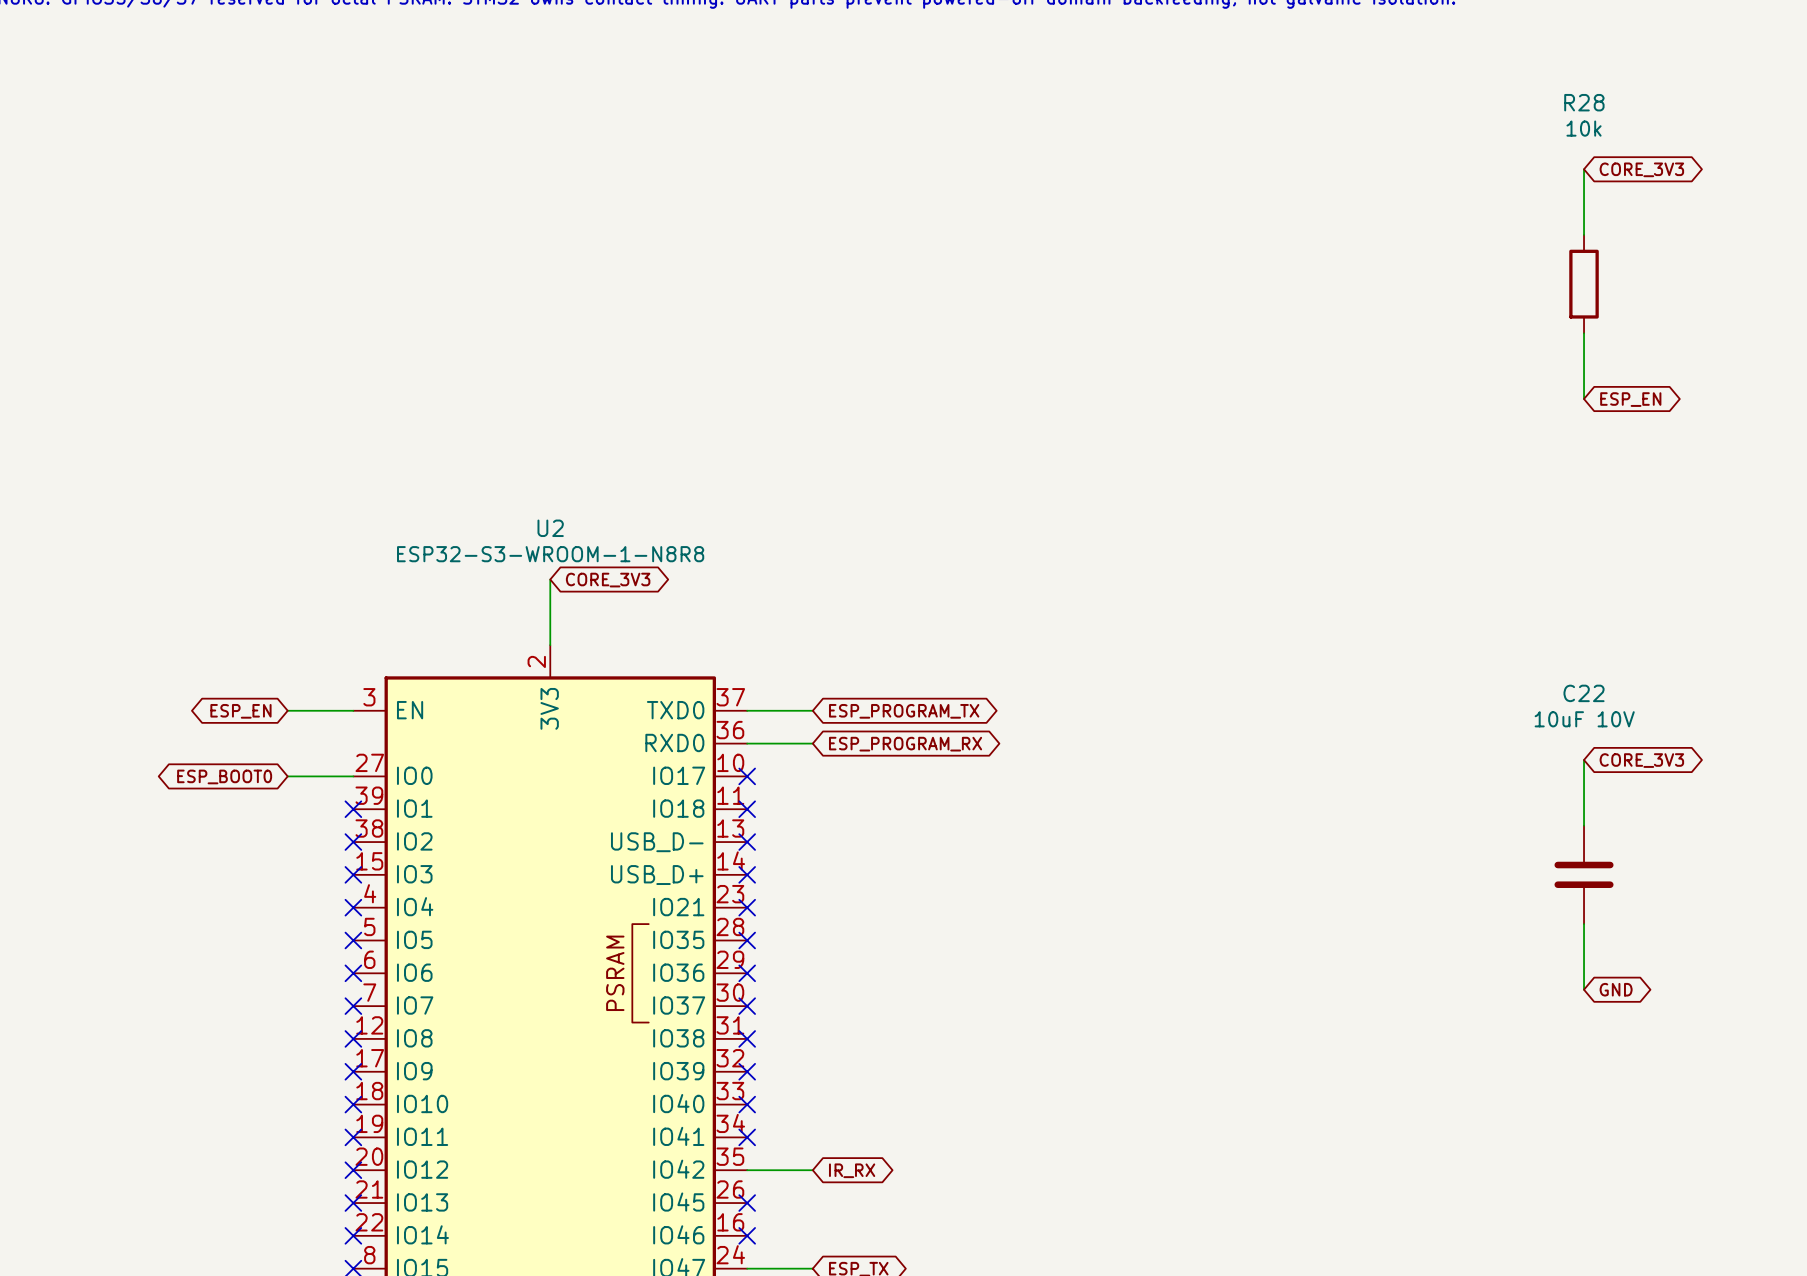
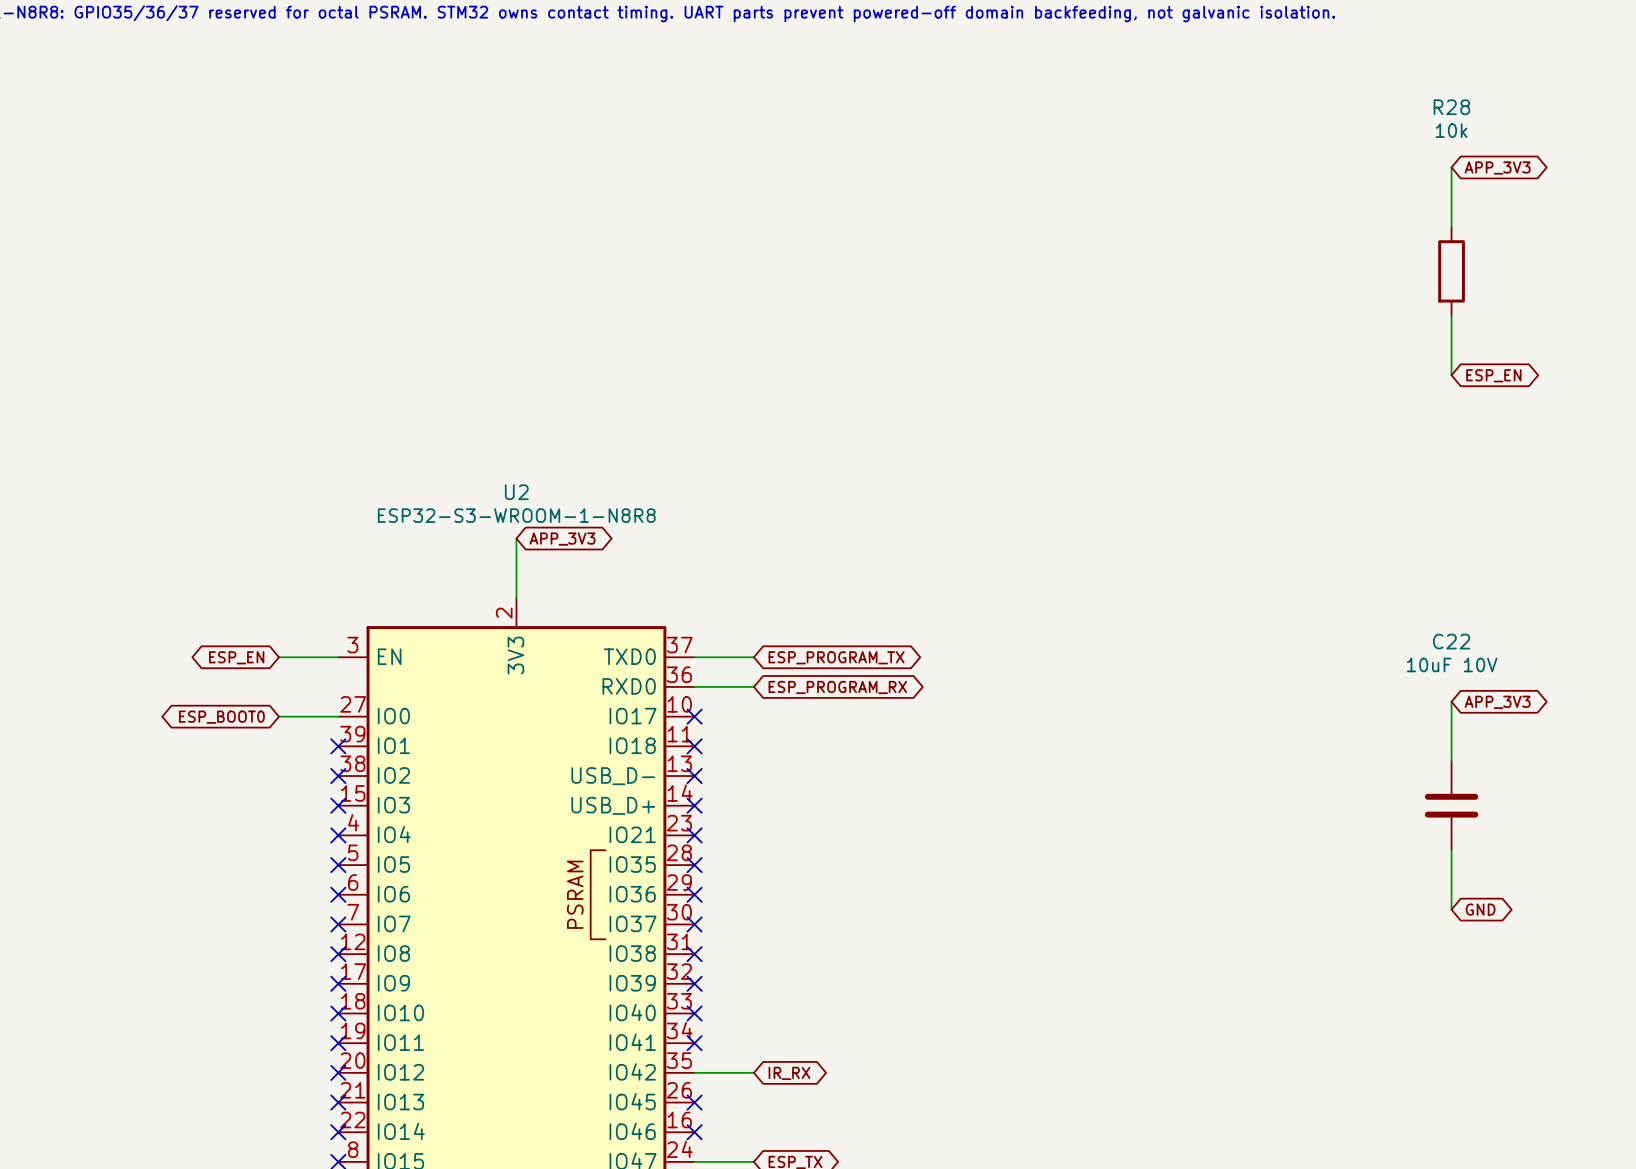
global label: CORE_3V3 (1641, 169) -> APP_3V3 (1497, 167)
global label: CORE_3V3 (608, 580) -> APP_3V3 (562, 539)
global label: CORE_3V3 (1641, 760) -> APP_3V3 (1497, 702)

